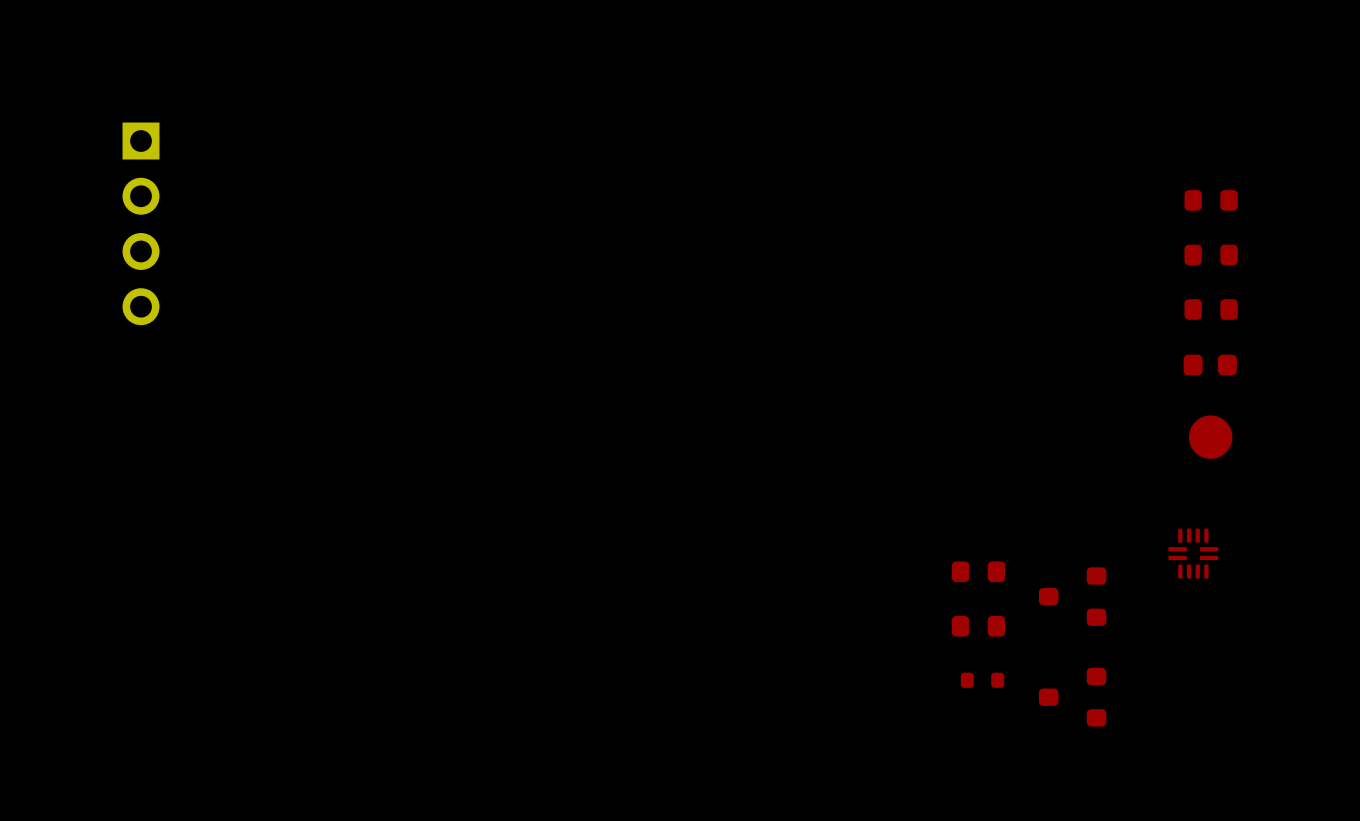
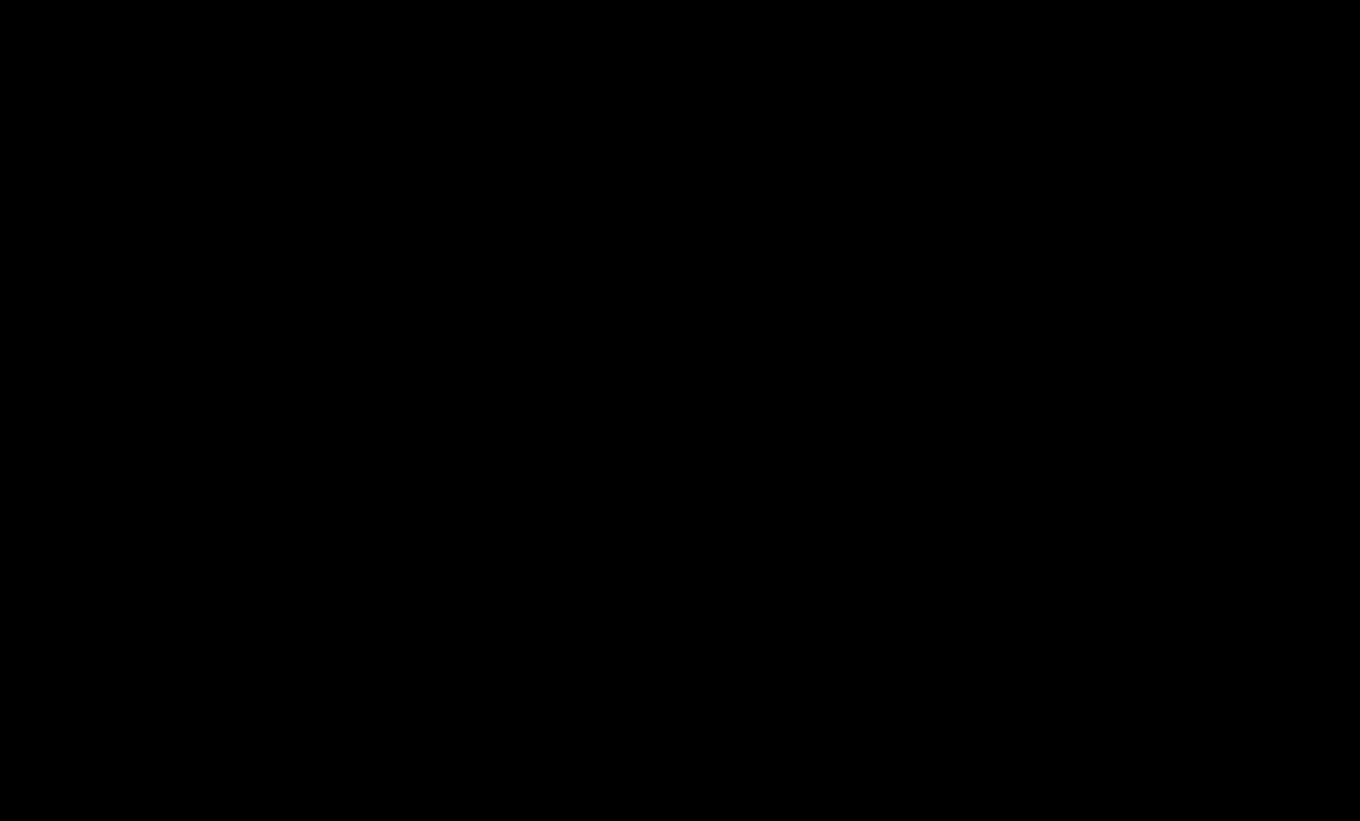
part: (1211, 200) -> none
part: (141, 223) -> none
part: (1211, 254) -> none
part: (1211, 309) -> none
part: (1210, 364) -> none
part: (1210, 437) -> none
part: (1193, 553) -> none
part: (978, 571) -> none
part: (1072, 596) -> none
part: (978, 626) -> none
part: (982, 680) -> none
part: (1072, 697) -> none

